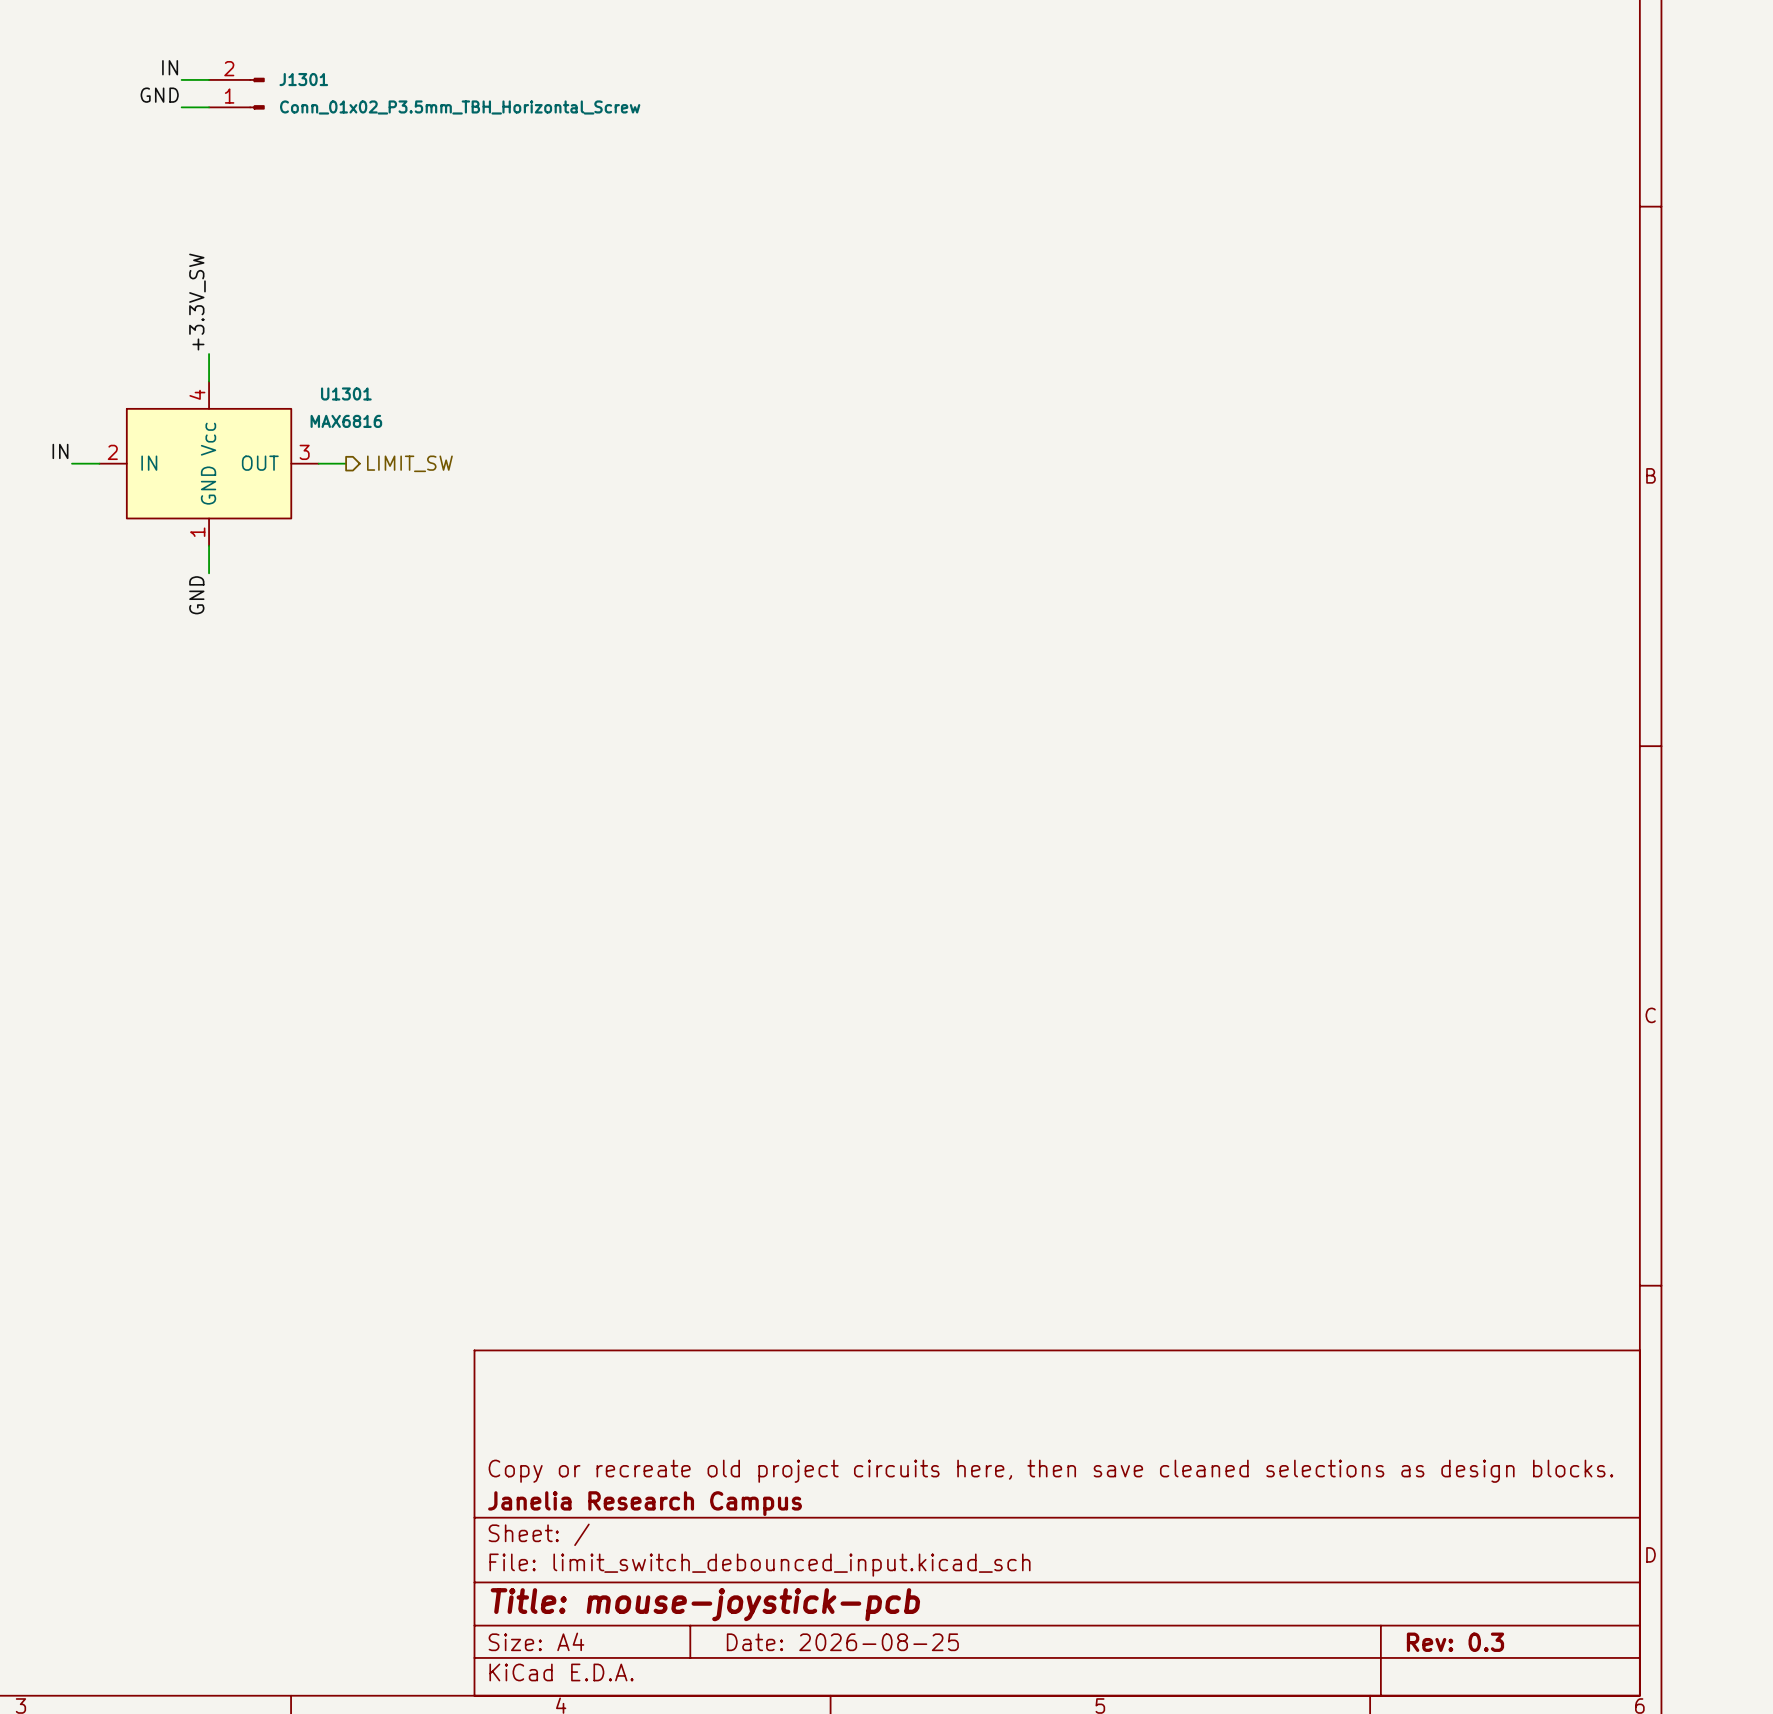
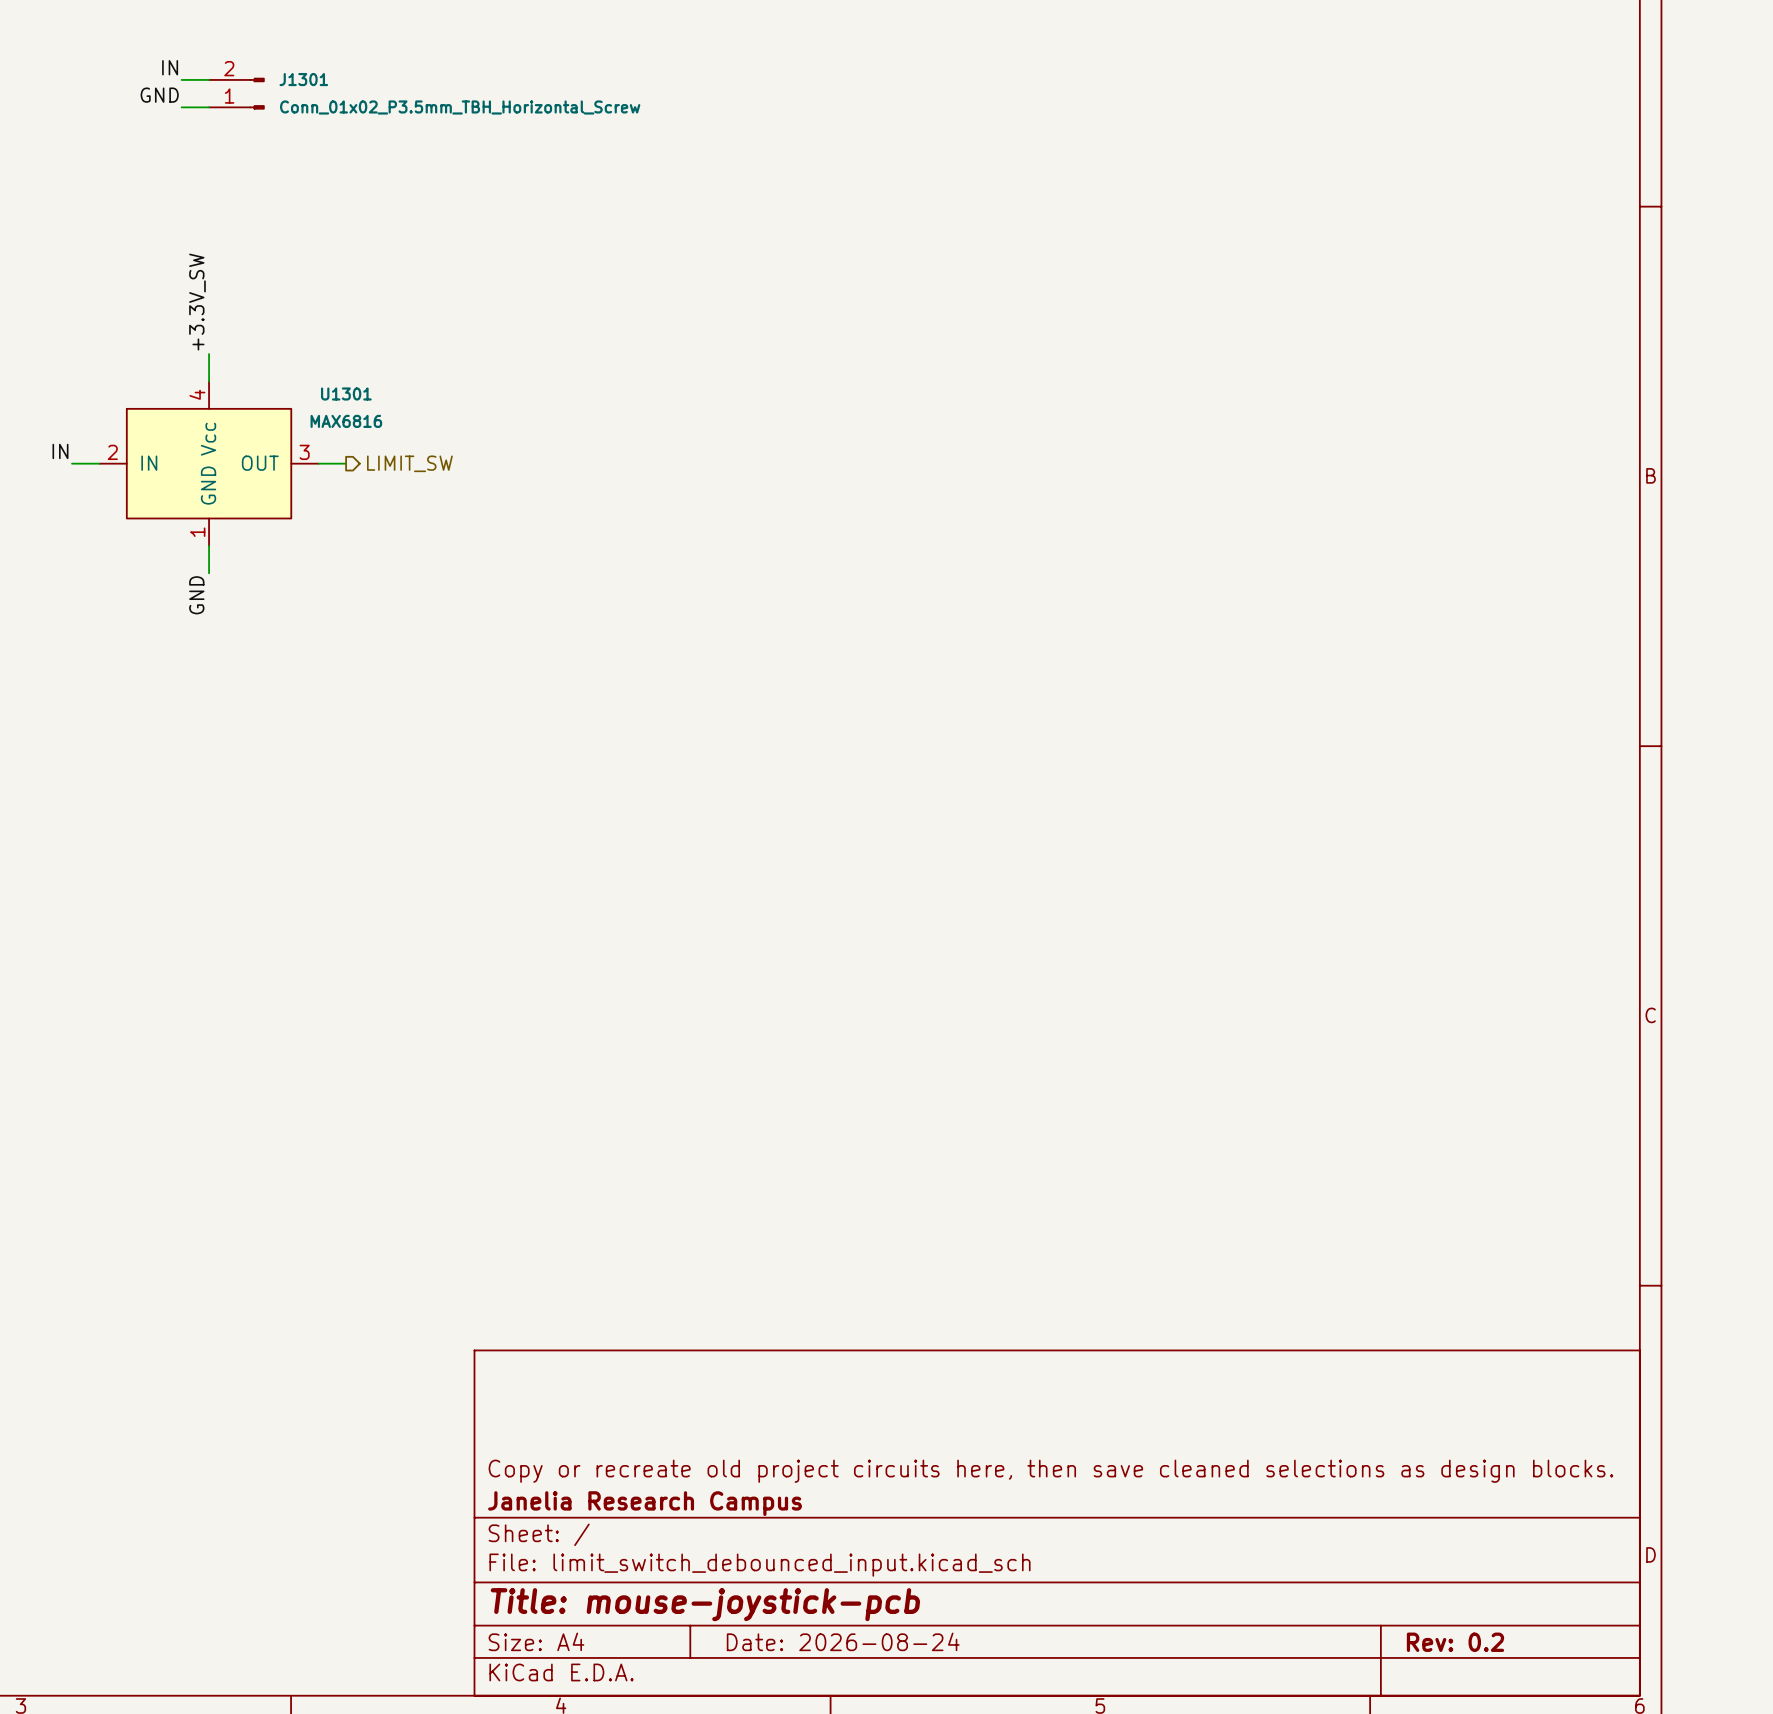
title block: Date: 2026-08-25 (842, 1642) -> Date: 2026-08-24 (843, 1641)
title block: Rev: 0.3 (1455, 1642) -> Rev: 0.2 (1455, 1642)

